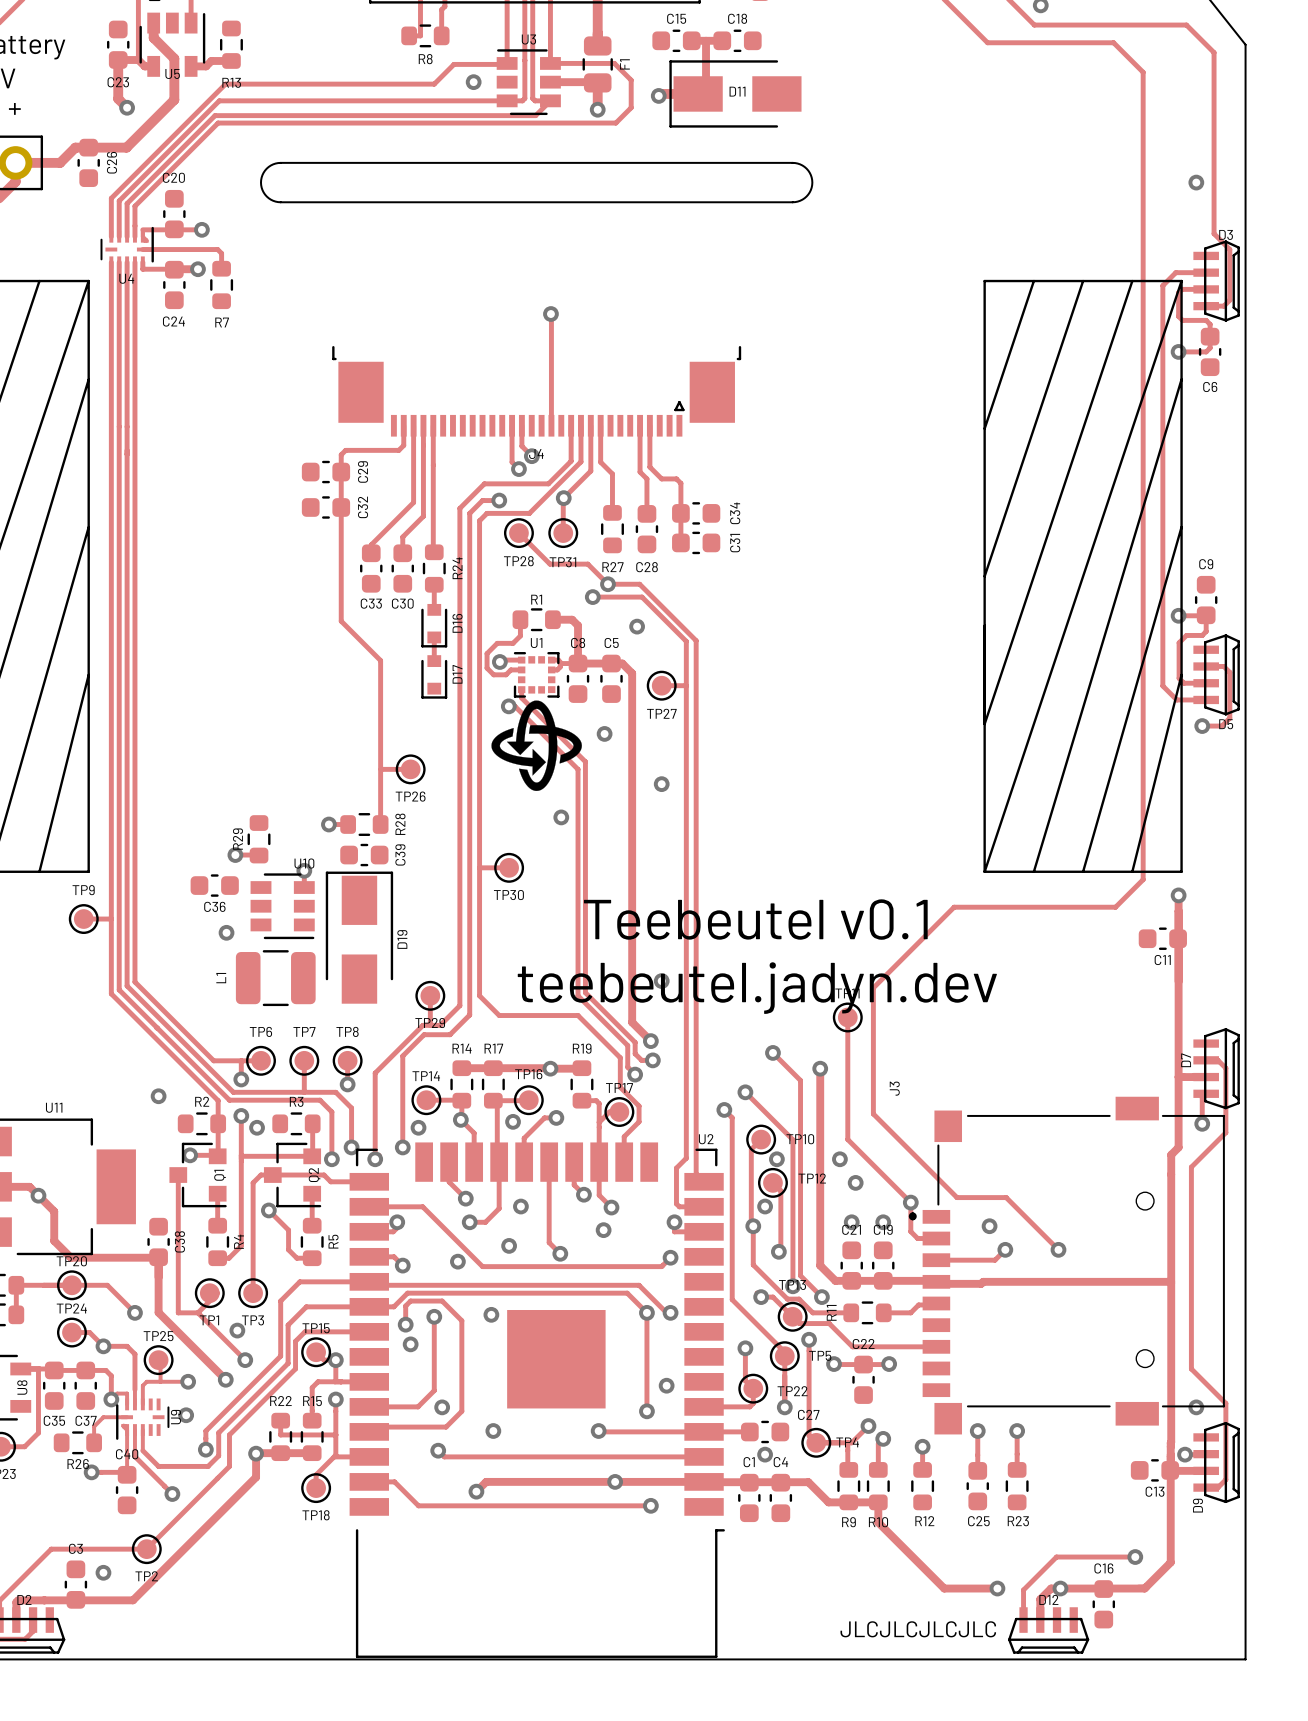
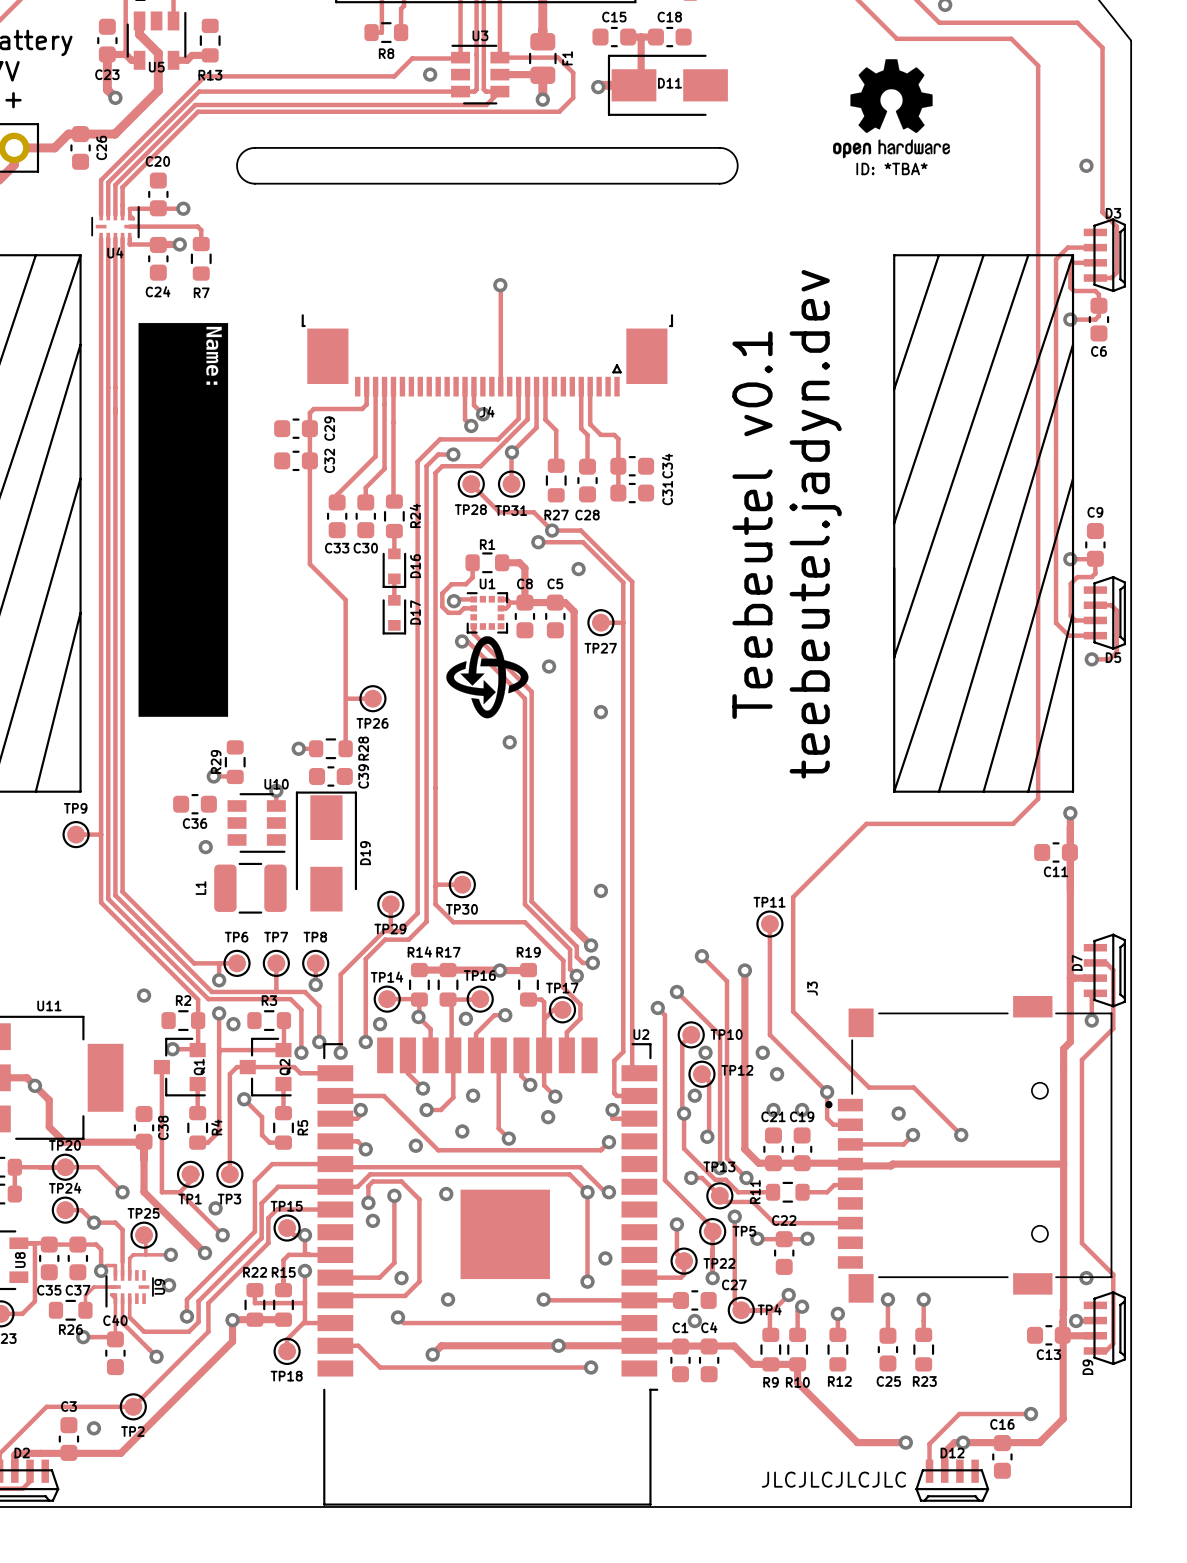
drawing: none -> [833, 59, 951, 159]
text: none -> ID: *TBA* (892, 168)
drawing: none -> [138, 322, 229, 717]
track: (479, 867) (509, 867) -> none
TP30 position: (509, 867) -> (462, 884)
text rotation: 0° (755, 919) -> 90° counterclockwise (752, 525)
track: none -> (462, 884) (437, 884) (435, 886)
text rotation: 0° (757, 988) -> 90° counterclockwise (815, 524)

